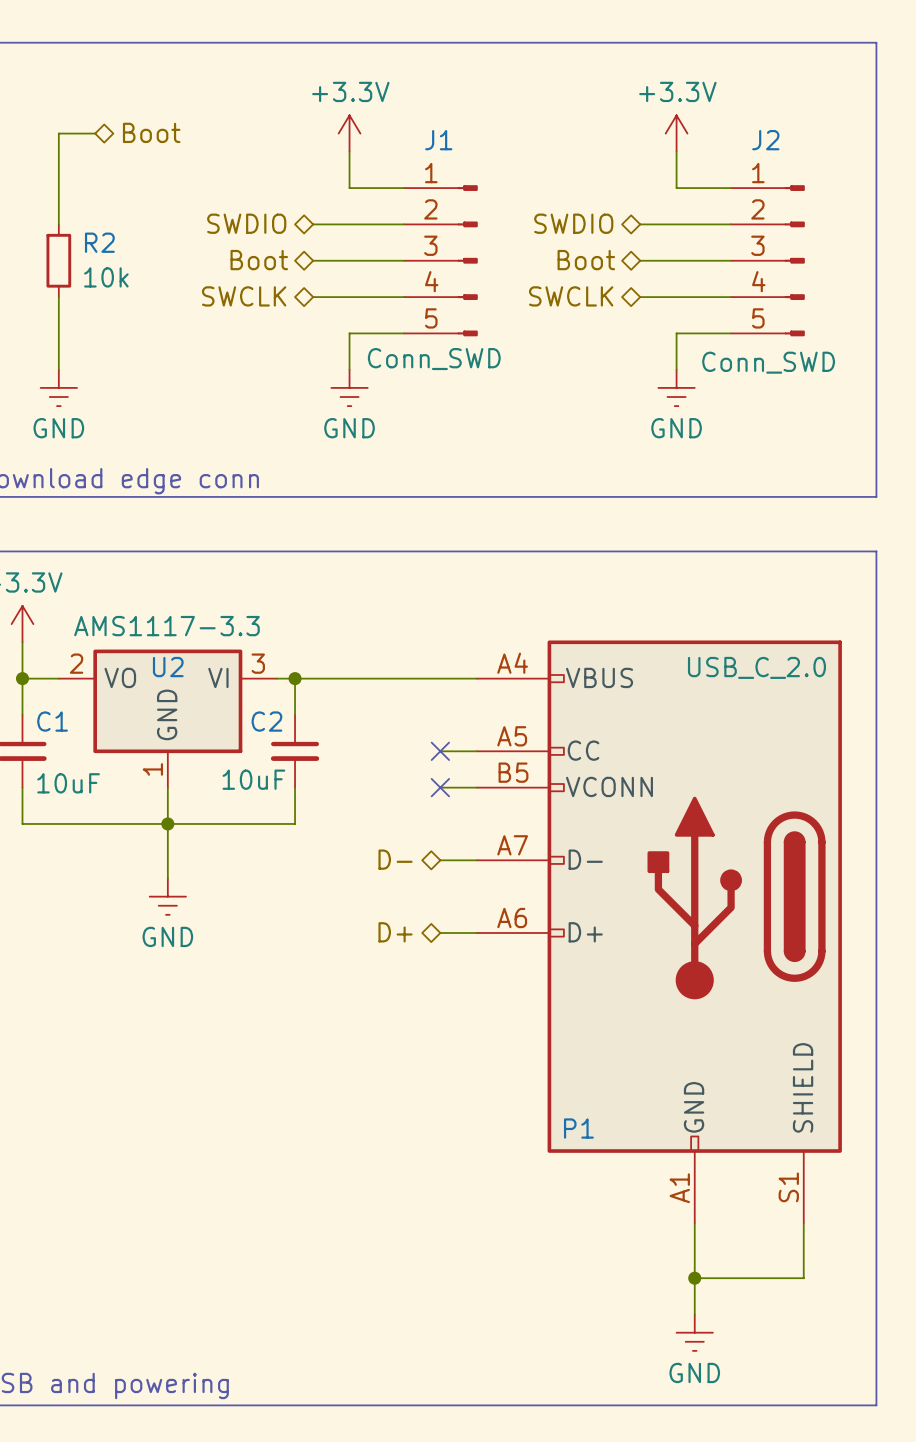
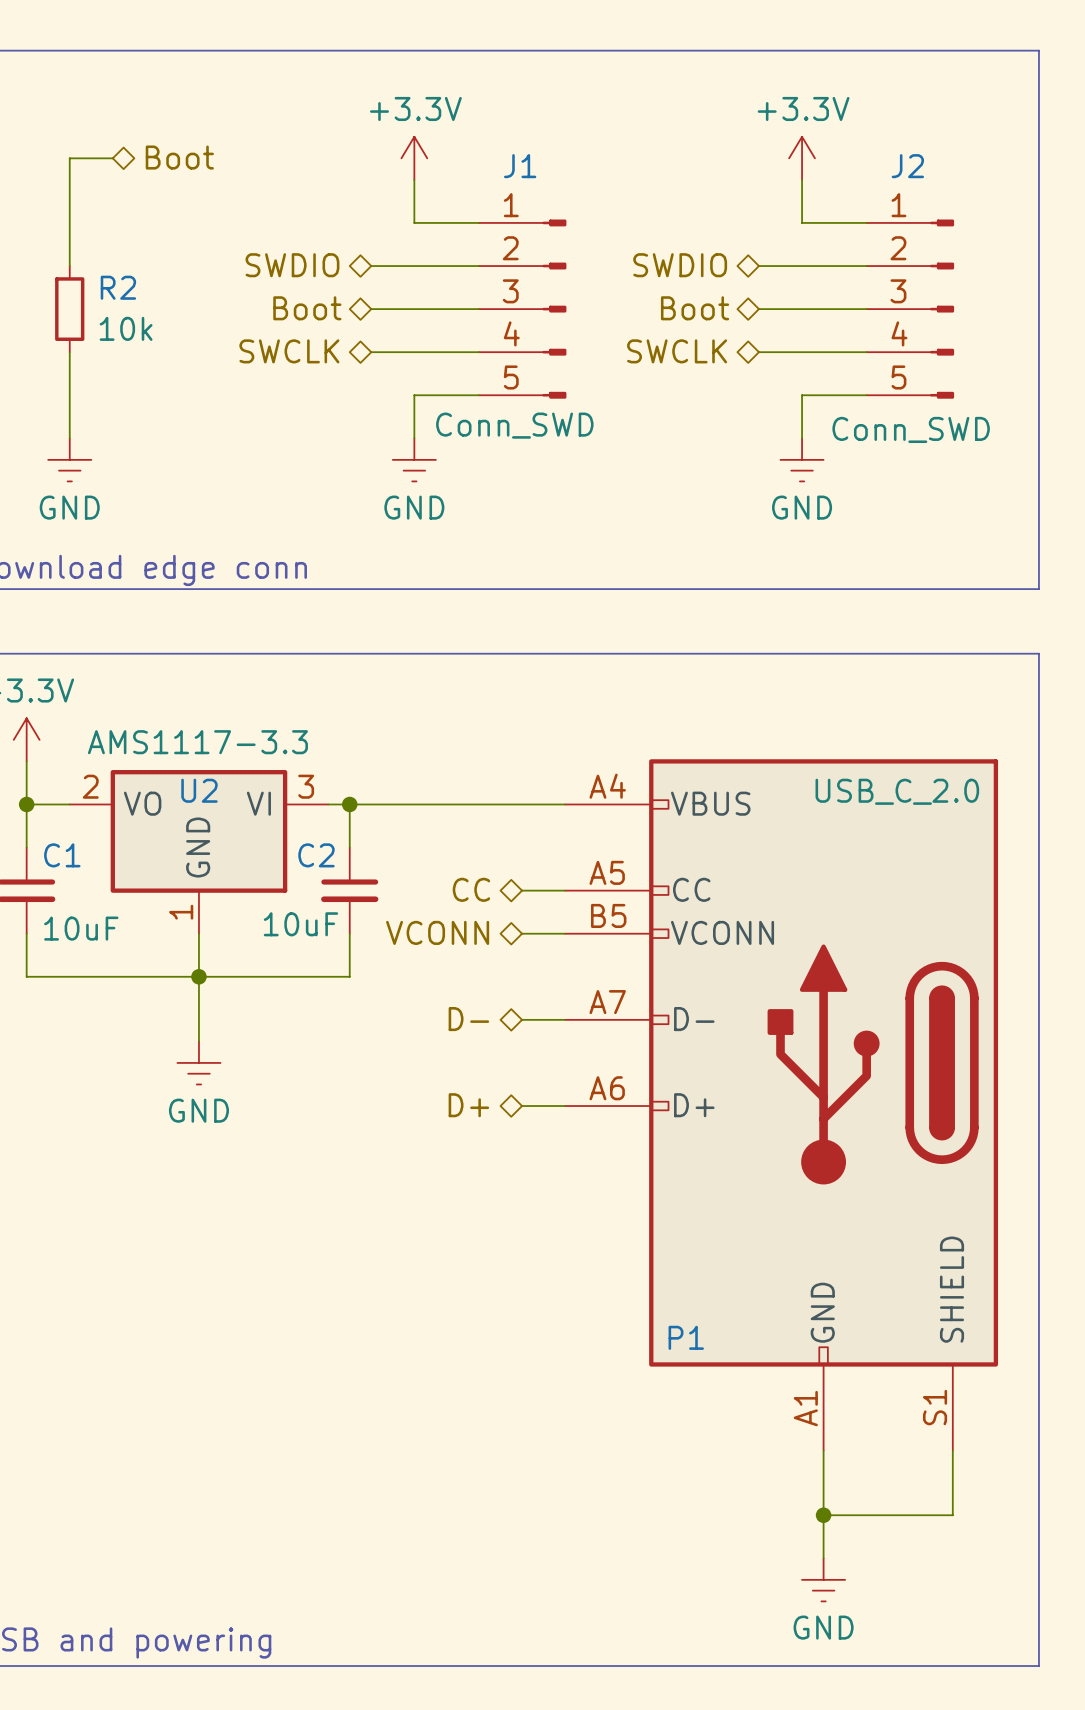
hierarchical label: none -> CC (471, 889)
no-connect mark: (440, 751) -> none
hierarchical label: none -> VCONN (437, 932)
no-connect mark: (440, 787) -> none

